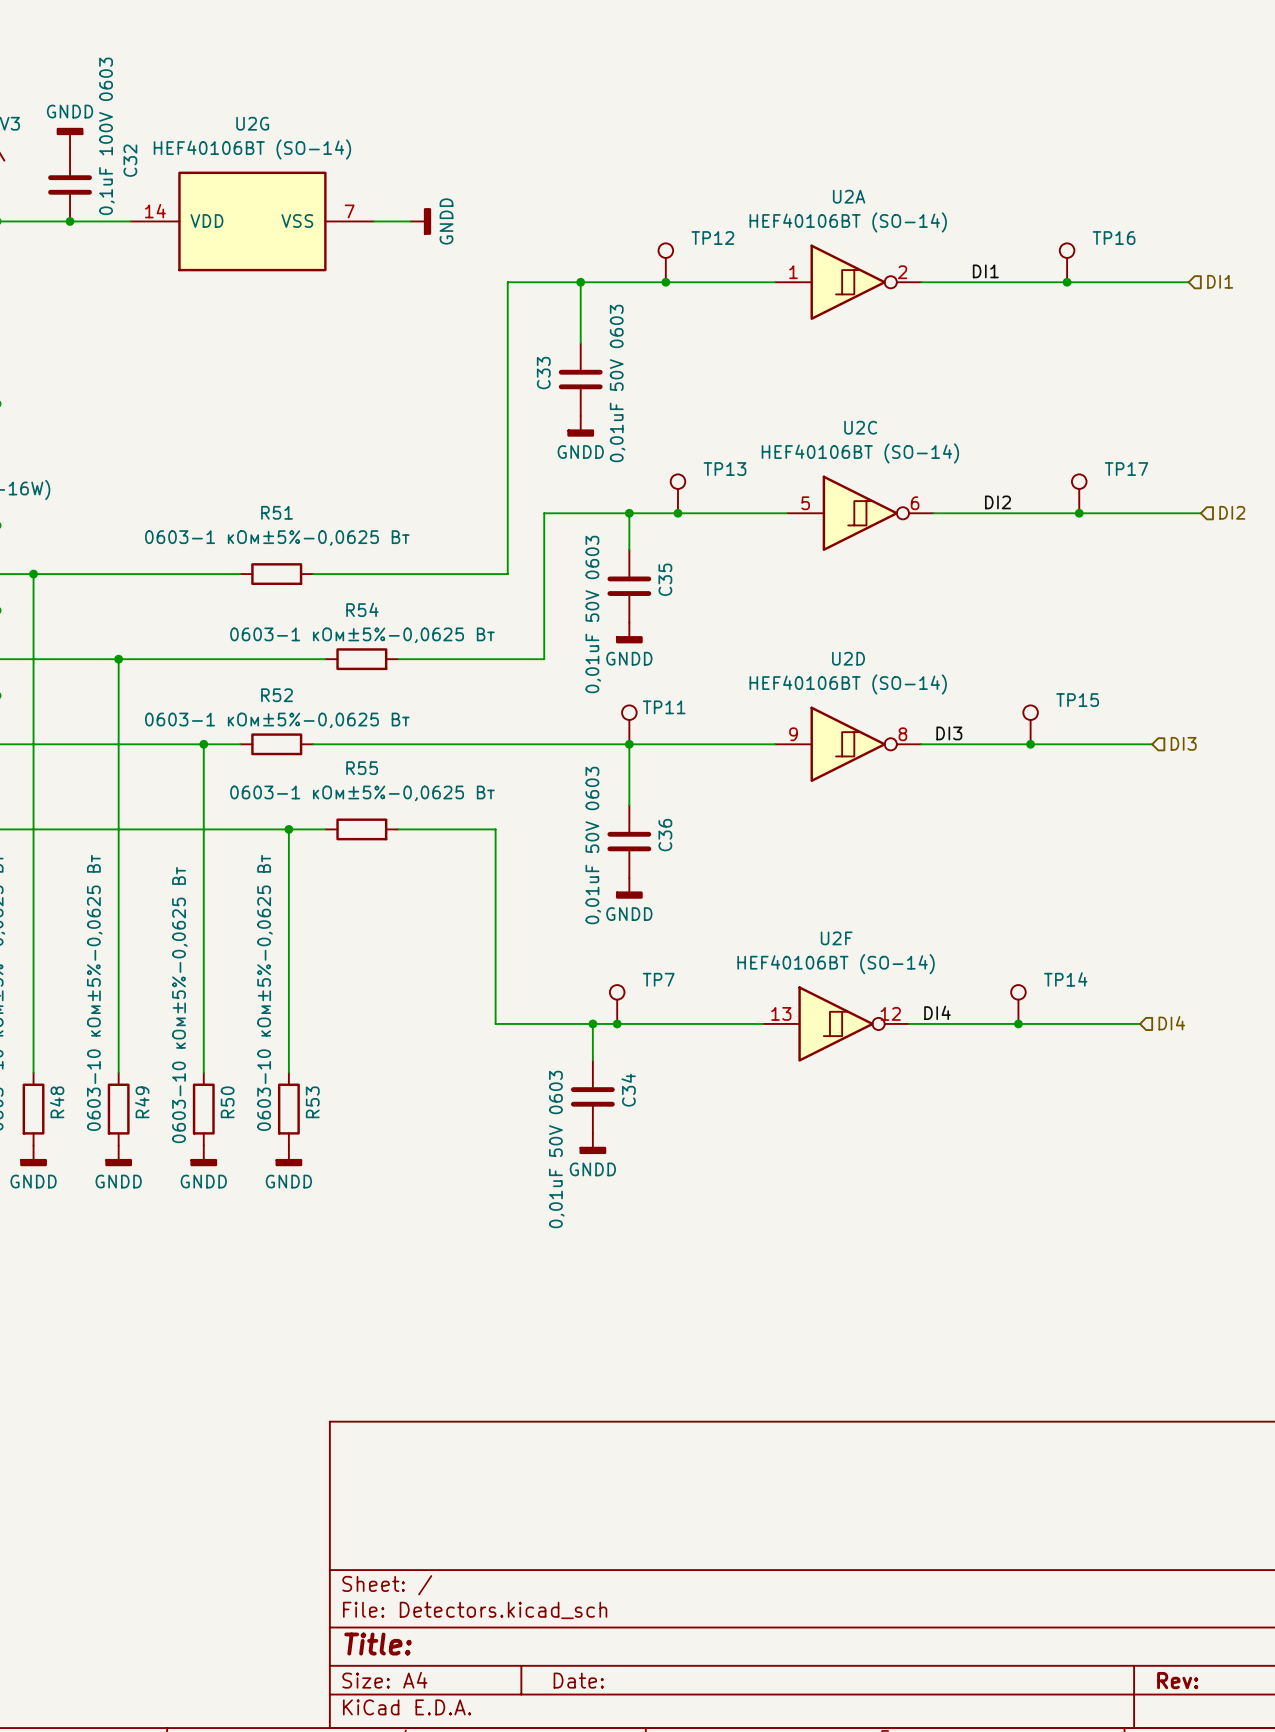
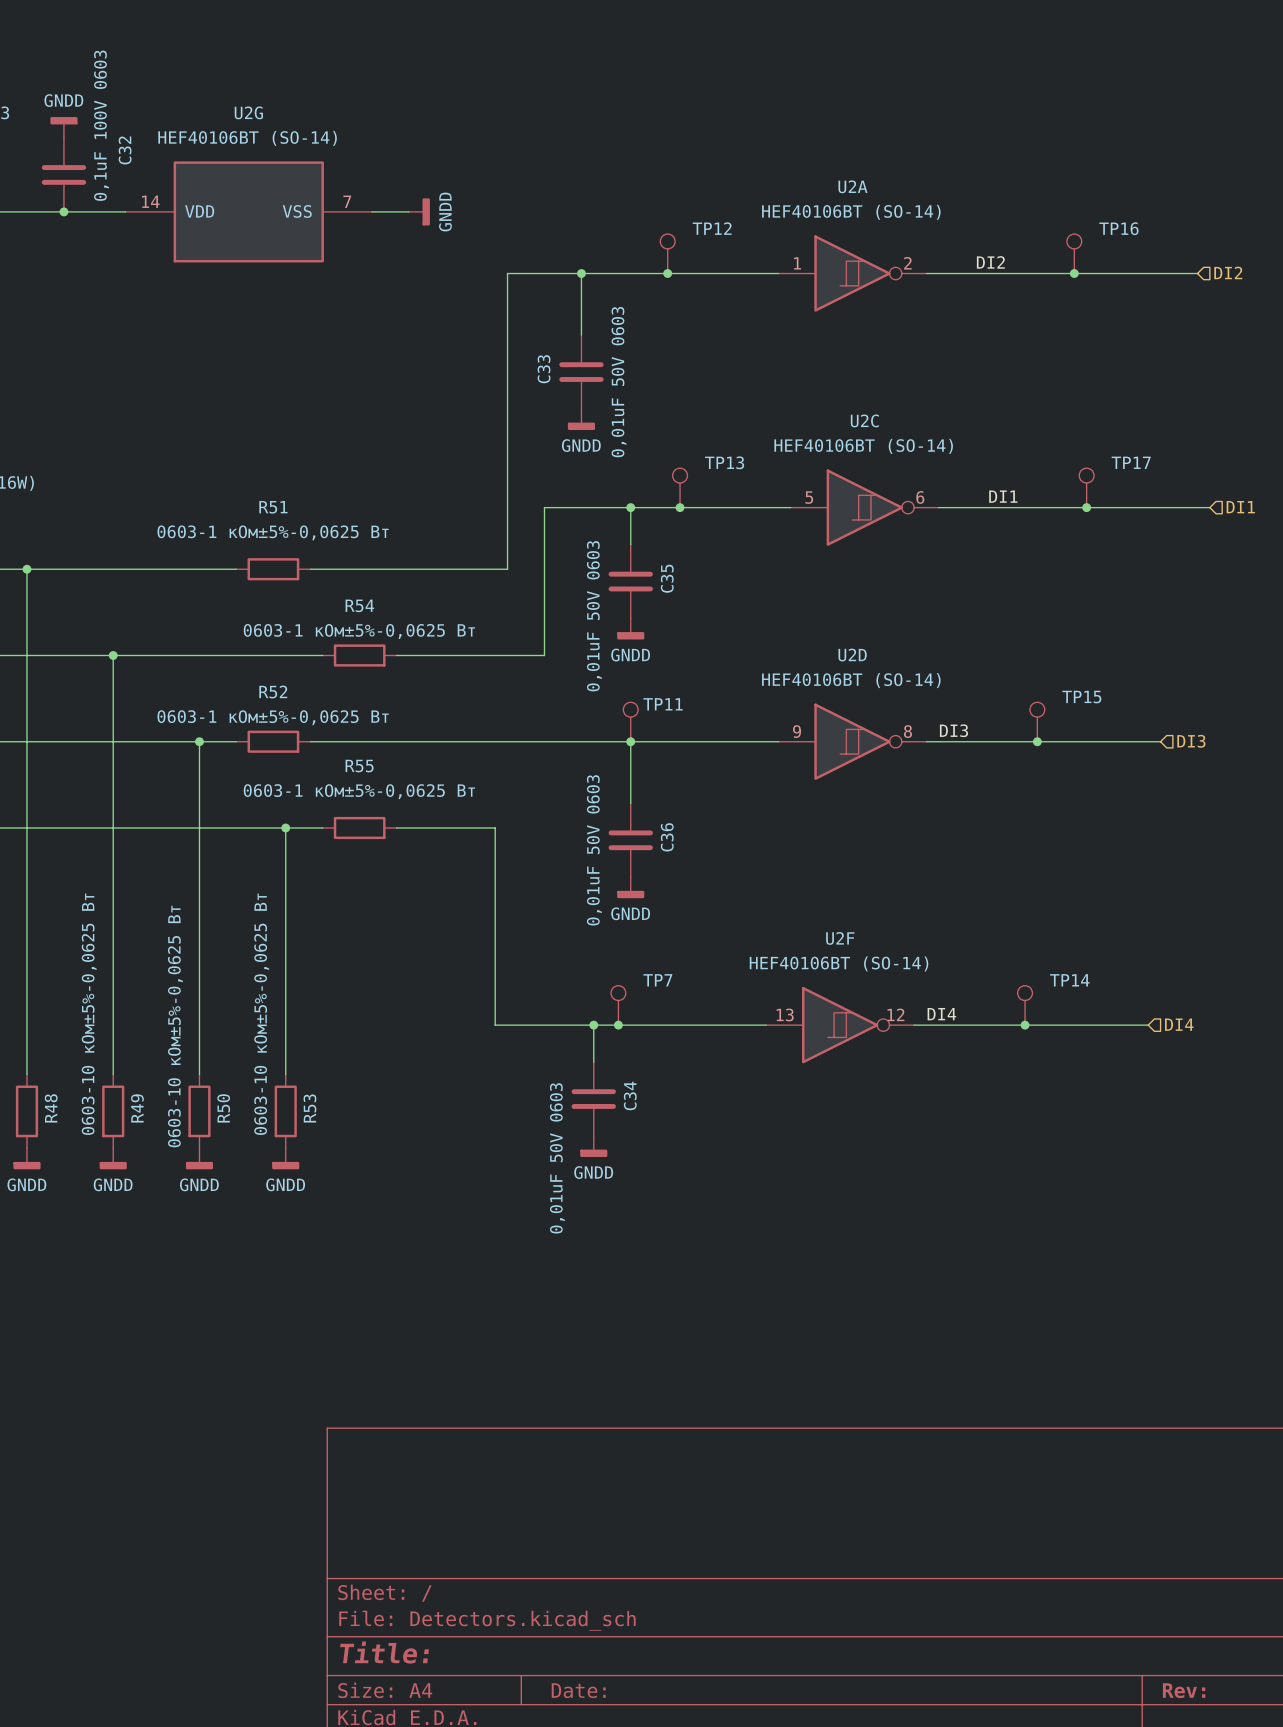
label: DI1 (985, 271) -> DI2 (990, 262)
hierarchical label: DI1 (1220, 281) -> DI2 (1228, 272)
label: DI2 (997, 502) -> DI1 (1003, 496)
hierarchical label: DI2 (1232, 512) -> DI1 (1240, 507)

